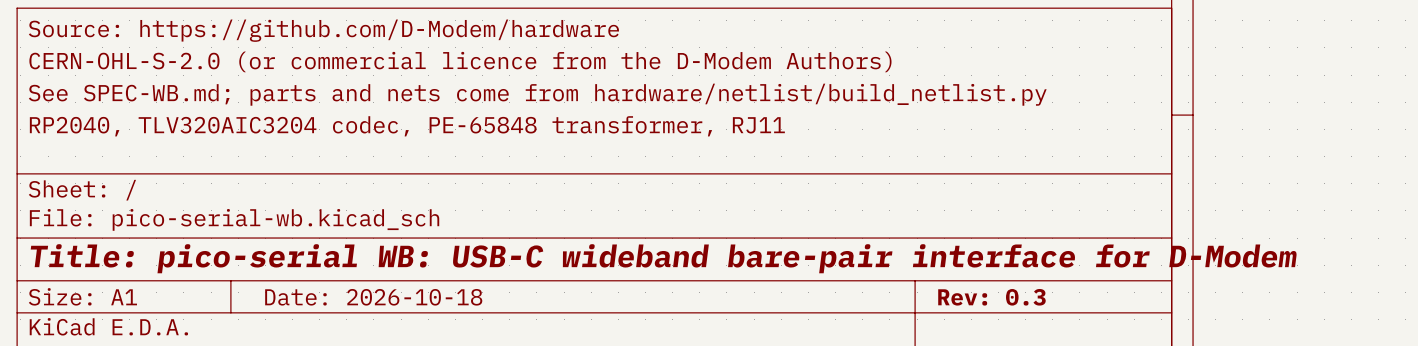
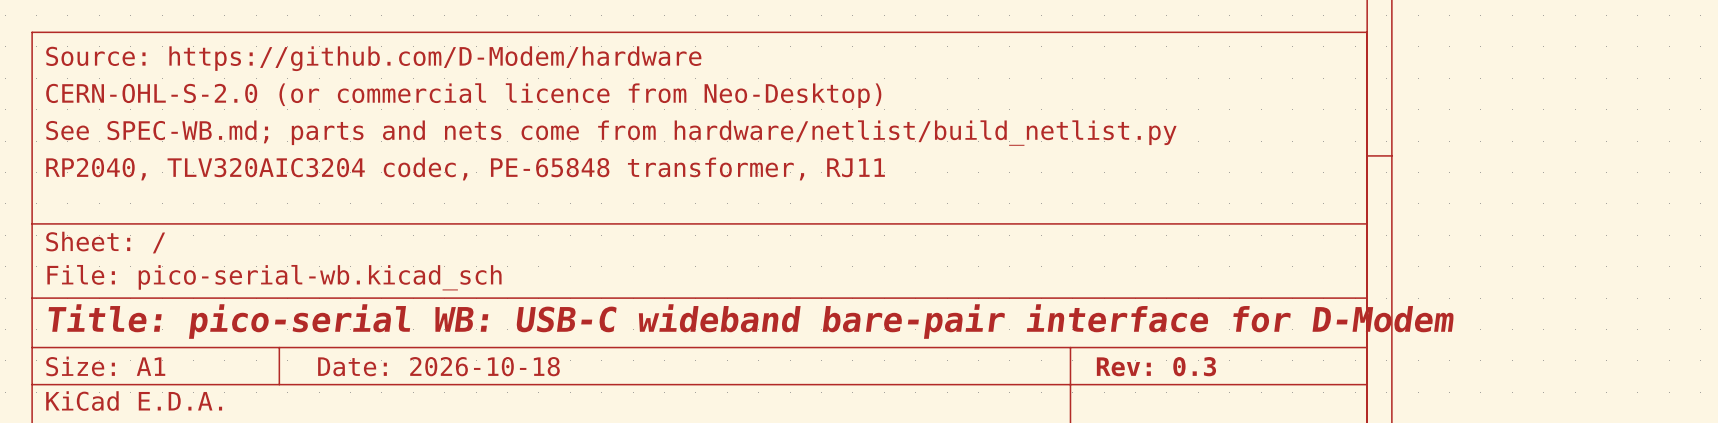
title block: CERN-OHL-S-2.0 (or commercial licence from the D-Modem Authors) (460, 61) -> CERN-OHL-S-2.0 (or commercial licence from Neo-Desktop) (463, 95)

